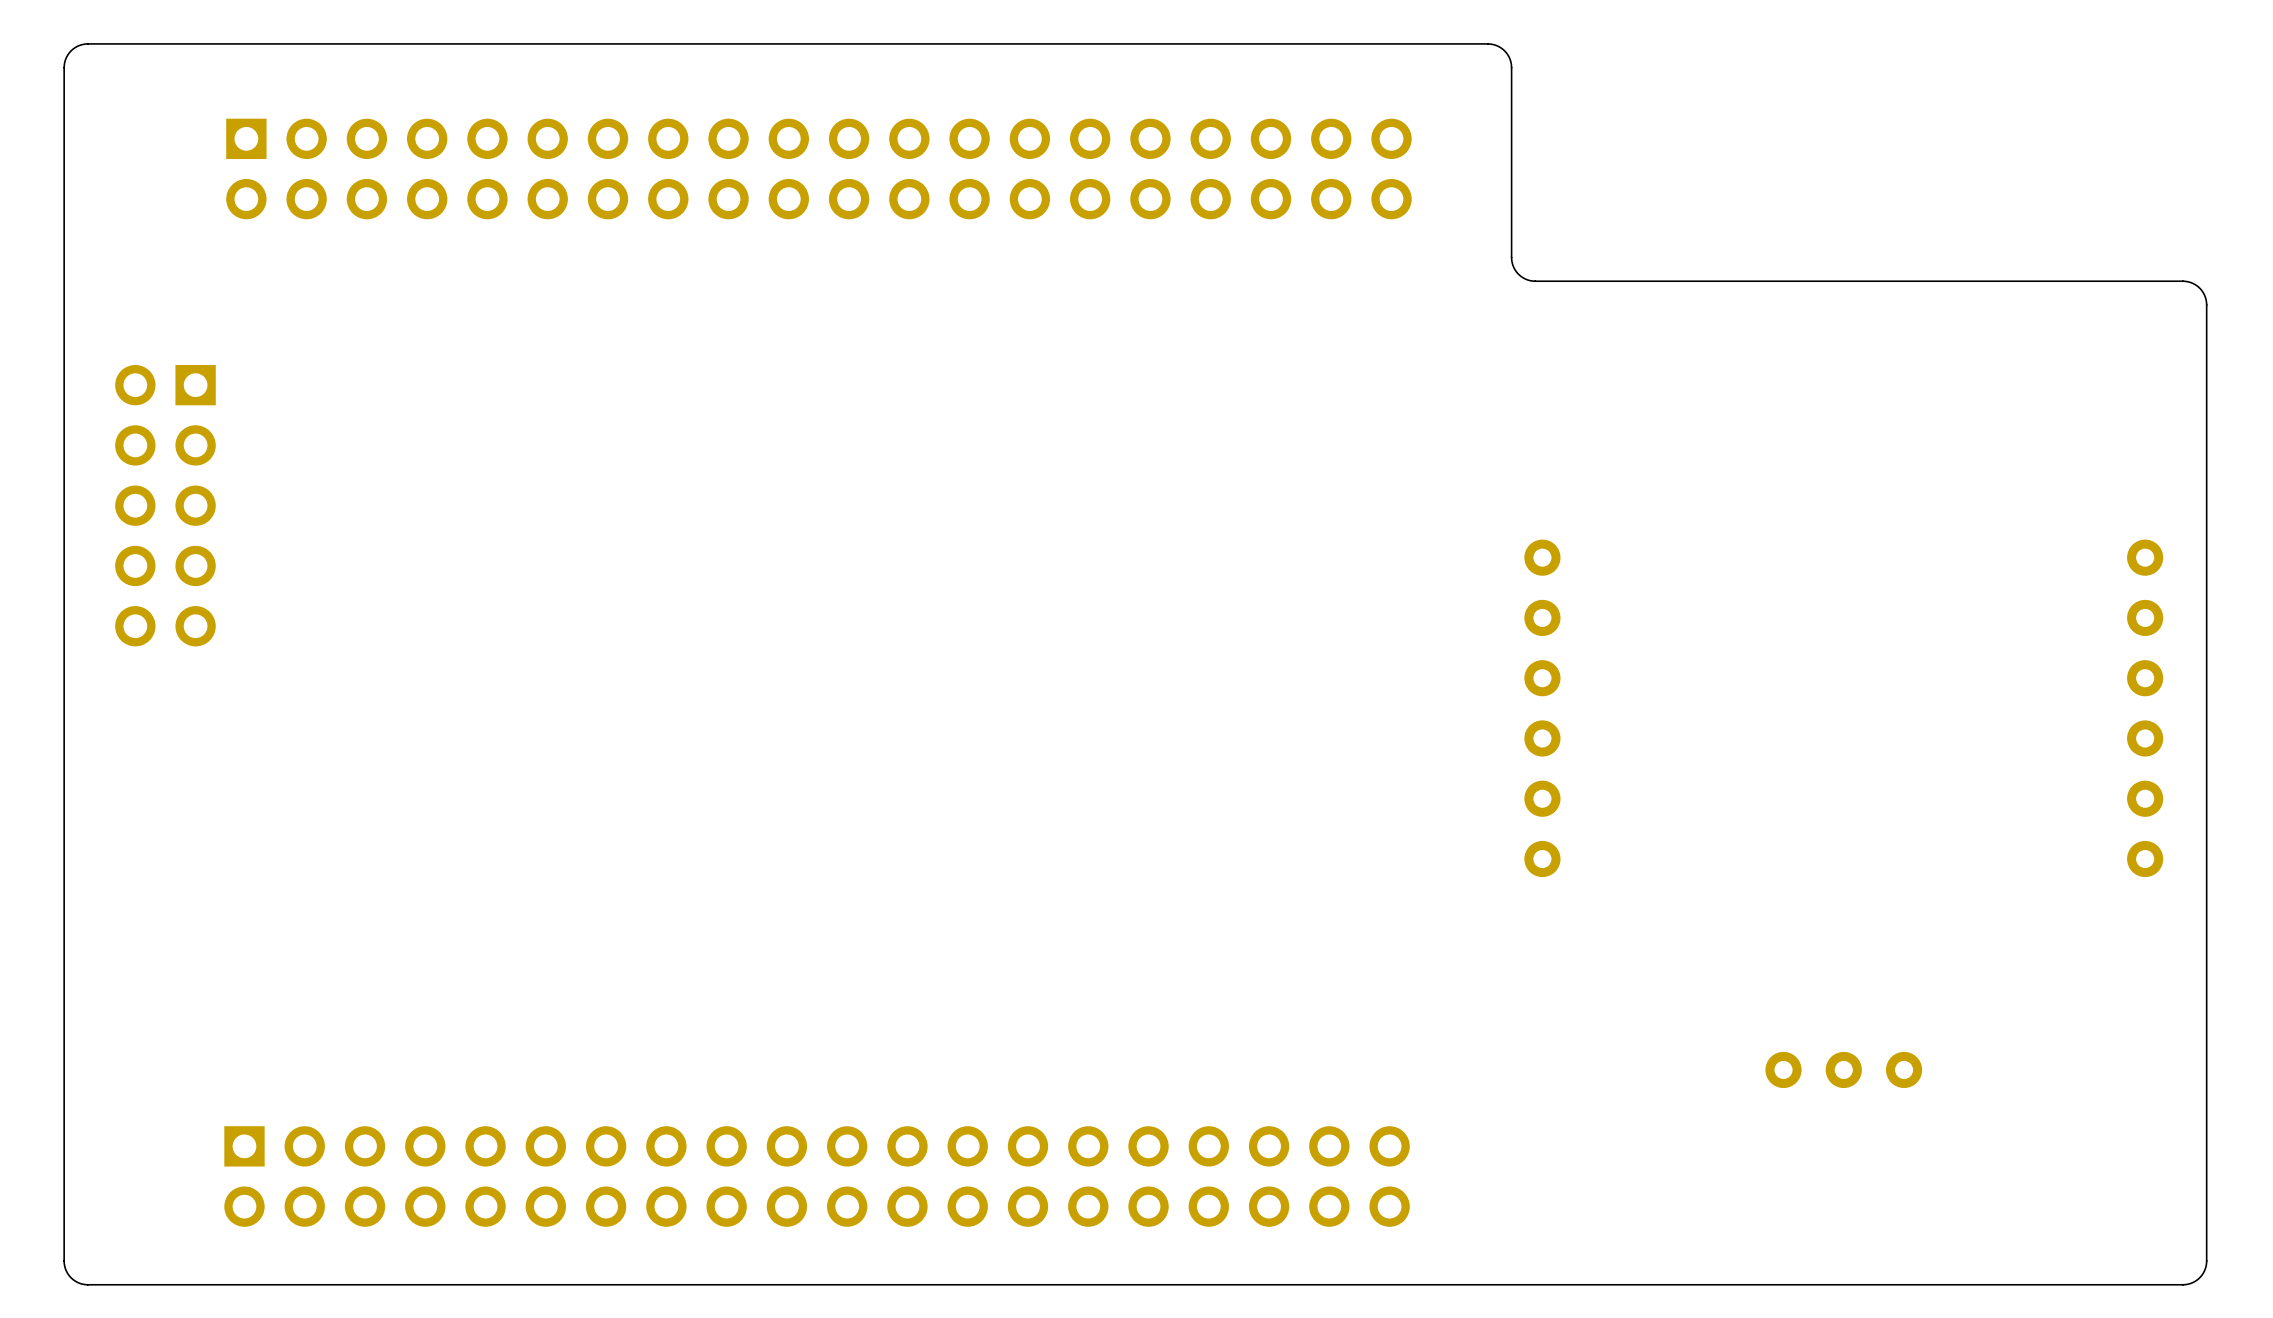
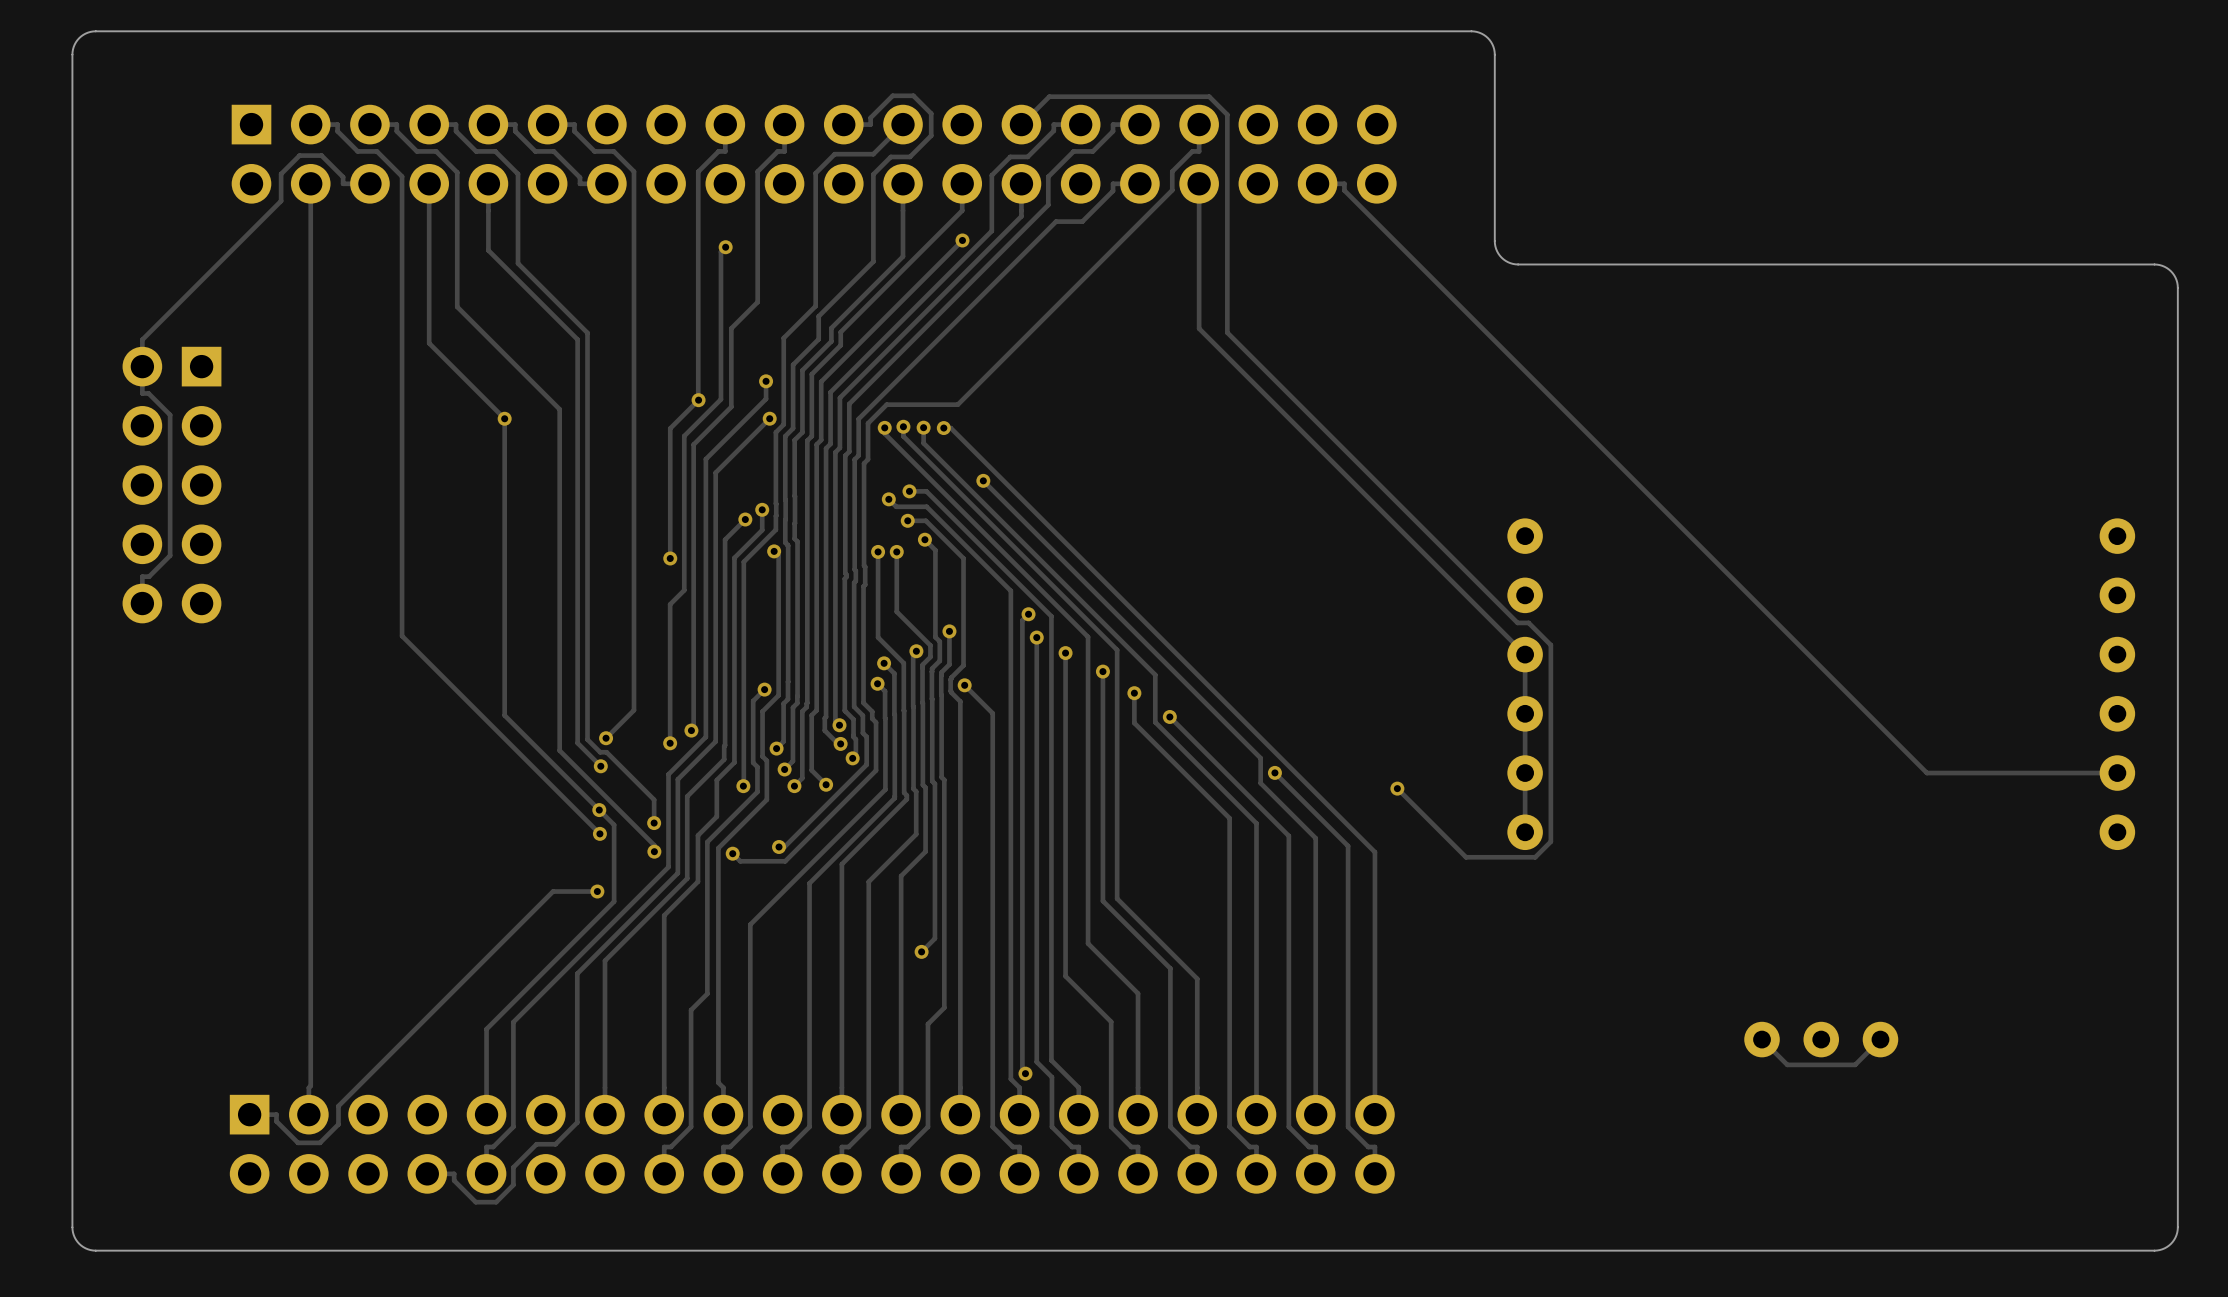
track: none -> (310, 124) (337, 124) (337, 131) (357, 151) (376, 151) (402, 176) (402, 636) (599, 833)
track: none -> (369, 124) (396, 124) (396, 131) (416, 151) (436, 151) (457, 172) (457, 306) (559, 409) (559, 750) (654, 845) (654, 851)
track: none -> (429, 124) (456, 124) (456, 131) (476, 151) (495, 151) (518, 174) (518, 263) (587, 332) (587, 739) (600, 752) (606, 752) (654, 799) (654, 823)
track: none -> (488, 124) (515, 124) (515, 131) (535, 151) (553, 151) (580, 177) (580, 183) (606, 183)
track: none -> (547, 124) (574, 124) (574, 131) (594, 151) (613, 151) (633, 171) (633, 710) (606, 738)
track: none -> (725, 124) (725, 151) (718, 151) (698, 171) (698, 399)
track: none -> (784, 124) (784, 151) (777, 151) (757, 171) (757, 302) (731, 328) (731, 406) (693, 444) (693, 728) (691, 730)
track: none -> (843, 124) (870, 124) (870, 117) (892, 95) (913, 95) (931, 113) (931, 135) (909, 156) (890, 156) (873, 174) (873, 261) (818, 316) (818, 339) (793, 364) (793, 428) (785, 436) (785, 499)
track: none -> (902, 124) (873, 154) (834, 154) (815, 173) (815, 306) (783, 338) (783, 424) (775, 432) (775, 529) (743, 561) (743, 786)
track: none -> (1021, 124) (1049, 96) (1209, 96) (1227, 114) (1227, 332) (1517, 622) (1528, 622) (1550, 645) (1550, 841) (1535, 857) (1466, 857) (1397, 788)
track: none -> (1080, 124) (1053, 124) (1053, 130) (1027, 156) (1010, 156) (991, 175) (991, 230) (830, 392) (830, 443) (826, 448) (824, 730) (838, 743) (840, 743)
track: none -> (1139, 124) (1113, 124) (1113, 131) (1092, 151) (1073, 151) (1048, 176) (1048, 204) (849, 403) (849, 451) (845, 455) (844, 710) (853, 719) (855, 755) (852, 758)
track: none -> (1199, 124) (1199, 151) (1192, 151) (1172, 171) (1172, 190) (957, 404) (886, 404) (868, 423) (868, 459) (864, 463) (863, 702) (872, 711) (872, 718) (876, 722) (876, 770) (785, 861) (740, 861) (732, 853)
track: none -> (310, 183) (310, 1085) (308, 1087) (308, 1114)
track: none -> (369, 183) (343, 183) (343, 177) (321, 155) (299, 155) (281, 174) (281, 201) (142, 339) (142, 393) (148, 393) (170, 414) (170, 555) (149, 576) (142, 576) (142, 603)
track: none -> (429, 183) (429, 343) (504, 418) (504, 715) (614, 824) (614, 901) (486, 1029) (486, 1114)
track: none -> (488, 183) (488, 250) (577, 339) (577, 743) (600, 766)
track: none -> (902, 183) (902, 256) (831, 328) (831, 341) (802, 370) (802, 432) (794, 440) (794, 495)
track: none -> (962, 183) (962, 210) (840, 332) (840, 345) (811, 374) (811, 436) (807, 440) (807, 702) (806, 707) (802, 711) (802, 778) (794, 786)
track: none -> (1021, 183) (1021, 216) (839, 397) (839, 447) (835, 452) (835, 721) (839, 725)
track: none -> (1139, 183) (1113, 183) (1113, 190) (1082, 221) (1056, 221) (858, 418) (858, 455) (854, 459) (854, 706) (862, 715) (862, 733) (866, 736) (866, 764) (784, 846) (779, 846)
track: none -> (1199, 183) (1199, 328) (1525, 654) (1525, 832)
track: none -> (1317, 183) (1344, 183) (1344, 190) (1926, 773) (2117, 773)
track: none -> (962, 240) (821, 381) (821, 440) (816, 444) (816, 710) (811, 715) (811, 770) (826, 784)
via: none -> (962, 240)
track: none -> (725, 247) (720, 251) (720, 399) (684, 436) (684, 590) (670, 604) (670, 743)
via: none -> (725, 247)
track: none -> (766, 381) (766, 398) (705, 459) (705, 737) (668, 774) (668, 867) (513, 1022) (513, 1126) (493, 1147) (486, 1147) (486, 1173)
via: none -> (766, 381)
track: none -> (698, 400) (670, 428) (670, 558)
via: none -> (698, 400)
via: none -> (504, 418)
track: none -> (769, 418) (715, 472) (715, 741) (677, 779) (677, 873) (577, 973) (577, 1122) (555, 1144) (536, 1144) (513, 1167) (513, 1185) (496, 1202) (475, 1202) (454, 1180) (454, 1173) (427, 1173)
via: none -> (769, 418)
track: none -> (903, 426) (903, 436) (1117, 650) (1117, 898) (1197, 978) (1197, 1114)
via: none -> (903, 426)
track: none -> (884, 427) (884, 433) (1088, 637) (1088, 943) (1138, 993) (1138, 1114)
via: none -> (884, 427)
track: none -> (923, 427) (923, 443) (1155, 674) (1155, 722) (1256, 823) (1256, 1114)
via: none -> (923, 427)
track: none -> (943, 428) (950, 428) (1374, 852) (1374, 1114)
via: none -> (943, 428)
track: none -> (983, 480) (1260, 758) (1260, 783) (1315, 838) (1315, 1114)
via: none -> (983, 480)
track: none -> (909, 491) (926, 491) (1051, 616) (1051, 1060) (1078, 1087) (1078, 1114)
via: none -> (909, 491)
track: none -> (794, 496) (794, 523)
track: none -> (888, 499) (896, 506) (926, 506) (1010, 590) (1010, 1079) (1019, 1087) (1019, 1114)
via: none -> (888, 499)
track: none -> (785, 500) (785, 519)
track: none -> (762, 509) (762, 530) (734, 557) (734, 762) (716, 780) (716, 816) (697, 835) (697, 881) (664, 915) (664, 1114)
via: none -> (762, 509)
track: none -> (745, 519) (725, 539) (724, 759) (687, 796) (687, 878) (604, 960) (604, 1114)
via: none -> (745, 519)
track: none -> (785, 519) (785, 542) (788, 545) (788, 681)
track: none -> (907, 520) (925, 520) (963, 558) (963, 665) (950, 679) (950, 691) (960, 701) (960, 1114)
via: none -> (907, 520)
track: none -> (794, 523) (794, 538) (797, 541) (797, 696)
track: none -> (924, 539) (935, 550) (935, 637) (939, 641) (939, 660) (932, 668) (932, 671)
via: none -> (924, 539)
track: none -> (774, 551) (778, 555) (778, 695) (762, 711) (762, 756) (766, 760) (766, 799) (718, 848) (718, 1082) (723, 1087) (723, 1114)
via: none -> (774, 551)
track: none -> (878, 551) (878, 637) (903, 663) (904, 792) (906, 799) (841, 864) (841, 1114)
via: none -> (878, 551)
track: none -> (896, 551) (896, 611) (930, 645) (930, 657) (922, 664) (922, 667)
via: none -> (896, 551)
via: none -> (670, 558)
track: none -> (1028, 614) (1022, 620) (1022, 1070) (1025, 1073)
via: none -> (1028, 614)
track: none -> (949, 631) (949, 664) (941, 672) (941, 675) (941, 777) (944, 779) (944, 1007) (927, 1024) (927, 1126) (907, 1147) (901, 1147) (901, 1173)
via: none -> (949, 631)
track: none -> (1036, 637) (1036, 1062) (1051, 1077) (1051, 1126) (1072, 1147) (1078, 1147) (1078, 1173)
via: none -> (1036, 637)
track: none -> (916, 651) (913, 654) (913, 788) (916, 791) (916, 834) (868, 881) (868, 1126) (848, 1147) (841, 1147) (841, 1173)
via: none -> (916, 651)
track: none -> (1065, 653) (1065, 976) (1111, 1021) (1111, 1126) (1131, 1147) (1138, 1147) (1138, 1173)
via: none -> (1065, 653)
track: none -> (884, 663) (894, 673) (894, 798) (809, 883) (809, 1126) (789, 1147) (782, 1147) (782, 1173)
via: none -> (884, 663)
track: none -> (922, 667) (922, 785) (925, 787) (925, 851) (901, 876) (901, 1114)
track: none -> (931, 671) (932, 781) (934, 783) (934, 938) (921, 951)
track: none -> (1102, 671) (1102, 901) (1170, 968) (1170, 1126) (1190, 1147) (1197, 1147) (1197, 1173)
via: none -> (1102, 671)
track: none -> (787, 681) (787, 699) (783, 703) (783, 741) (776, 748)
track: none -> (877, 683) (885, 691) (885, 789) (750, 924) (750, 1126) (730, 1147) (723, 1147) (723, 1173)
via: none -> (877, 683)
track: none -> (964, 685) (992, 713) (992, 1126) (1012, 1147) (1019, 1147) (1019, 1173)
via: none -> (964, 685)
track: none -> (764, 689) (753, 701) (753, 762) (757, 767) (757, 791) (707, 842) (707, 993) (691, 1010) (691, 1126) (670, 1147) (664, 1147) (664, 1173)
via: none -> (764, 689)
track: none -> (1134, 693) (1134, 723) (1229, 818) (1229, 1126) (1249, 1147) (1256, 1147) (1256, 1173)
via: none -> (1134, 693)
track: none -> (797, 696) (797, 703) (792, 707) (792, 761) (784, 769)
track: none -> (1169, 716) (1288, 836) (1288, 1126) (1309, 1147) (1315, 1147) (1315, 1173)
via: none -> (1169, 716)
via: none -> (839, 725)
via: none -> (691, 730)
via: none -> (606, 738)
via: none -> (670, 743)
via: none -> (840, 743)
via: none -> (776, 748)
via: none -> (852, 758)
via: none -> (600, 766)
via: none -> (784, 769)
track: none -> (1274, 772) (1348, 846) (1348, 1126) (1368, 1147) (1374, 1147) (1374, 1173)
via: none -> (1274, 772)
via: none -> (826, 784)
via: none -> (743, 786)
via: none -> (794, 786)
via: none -> (1397, 788)
via: none -> (599, 810)
via: none -> (654, 823)
via: none -> (599, 833)
via: none -> (779, 846)
via: none -> (654, 851)
via: none -> (732, 853)
track: none -> (597, 891) (553, 891) (338, 1106) (338, 1124) (320, 1142) (297, 1142) (276, 1121) (276, 1114) (249, 1114)
via: none -> (597, 891)
via: none -> (921, 951)
track: none -> (1880, 1039) (1855, 1064) (1787, 1064) (1762, 1039)
via: none -> (1025, 1073)

